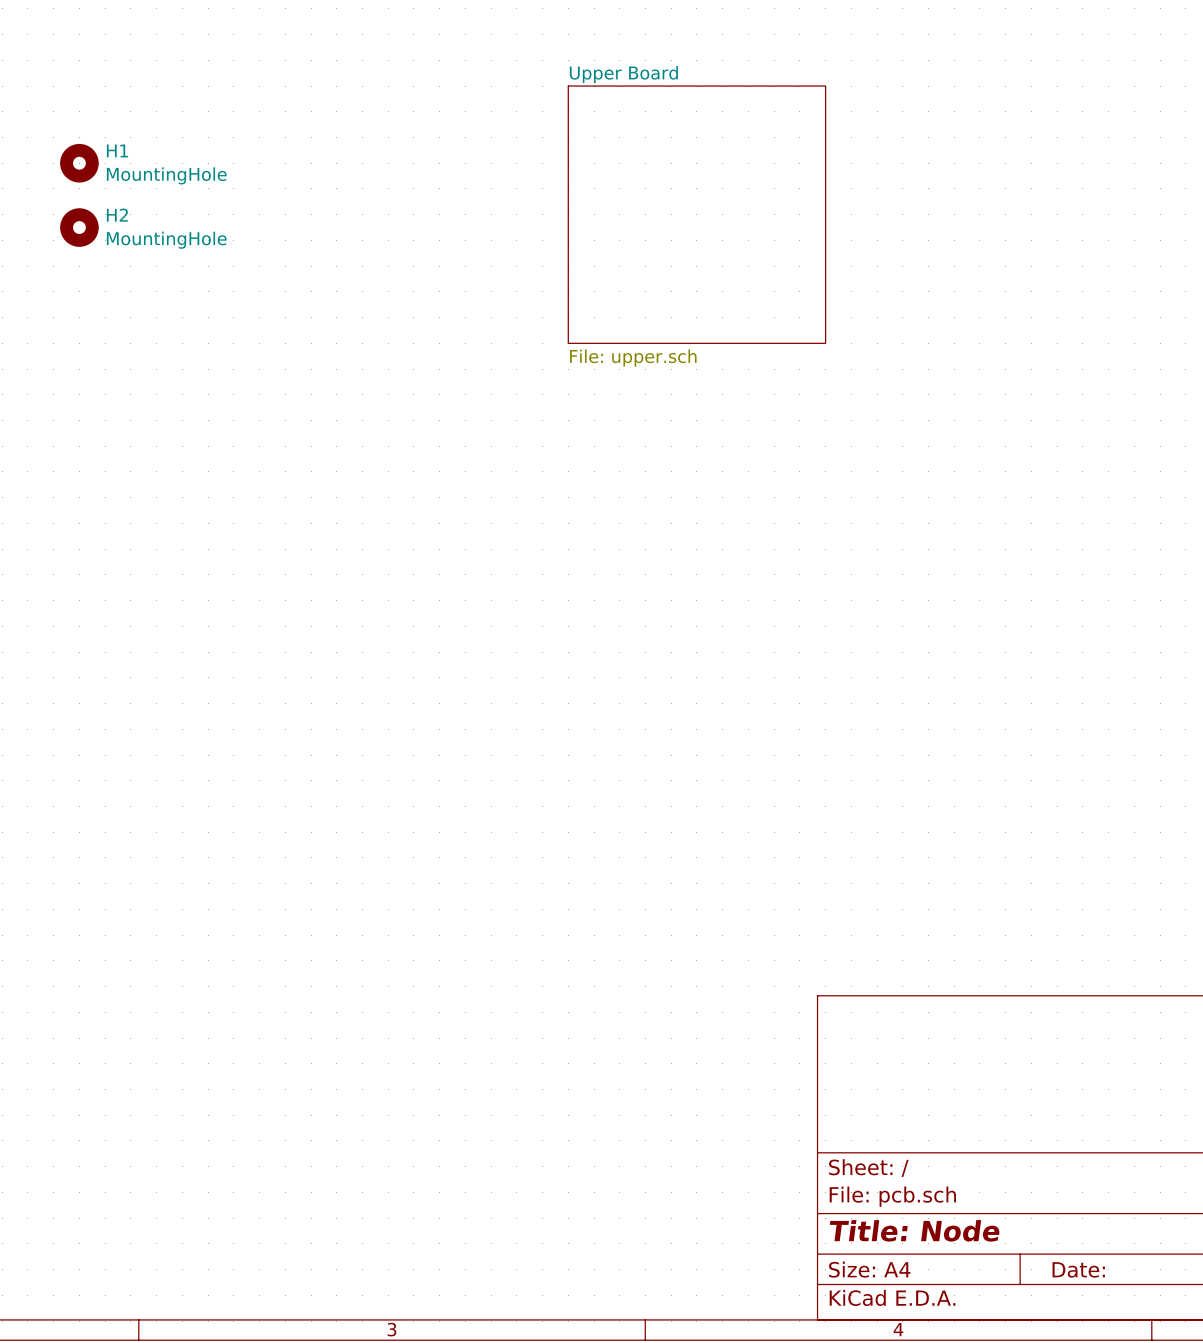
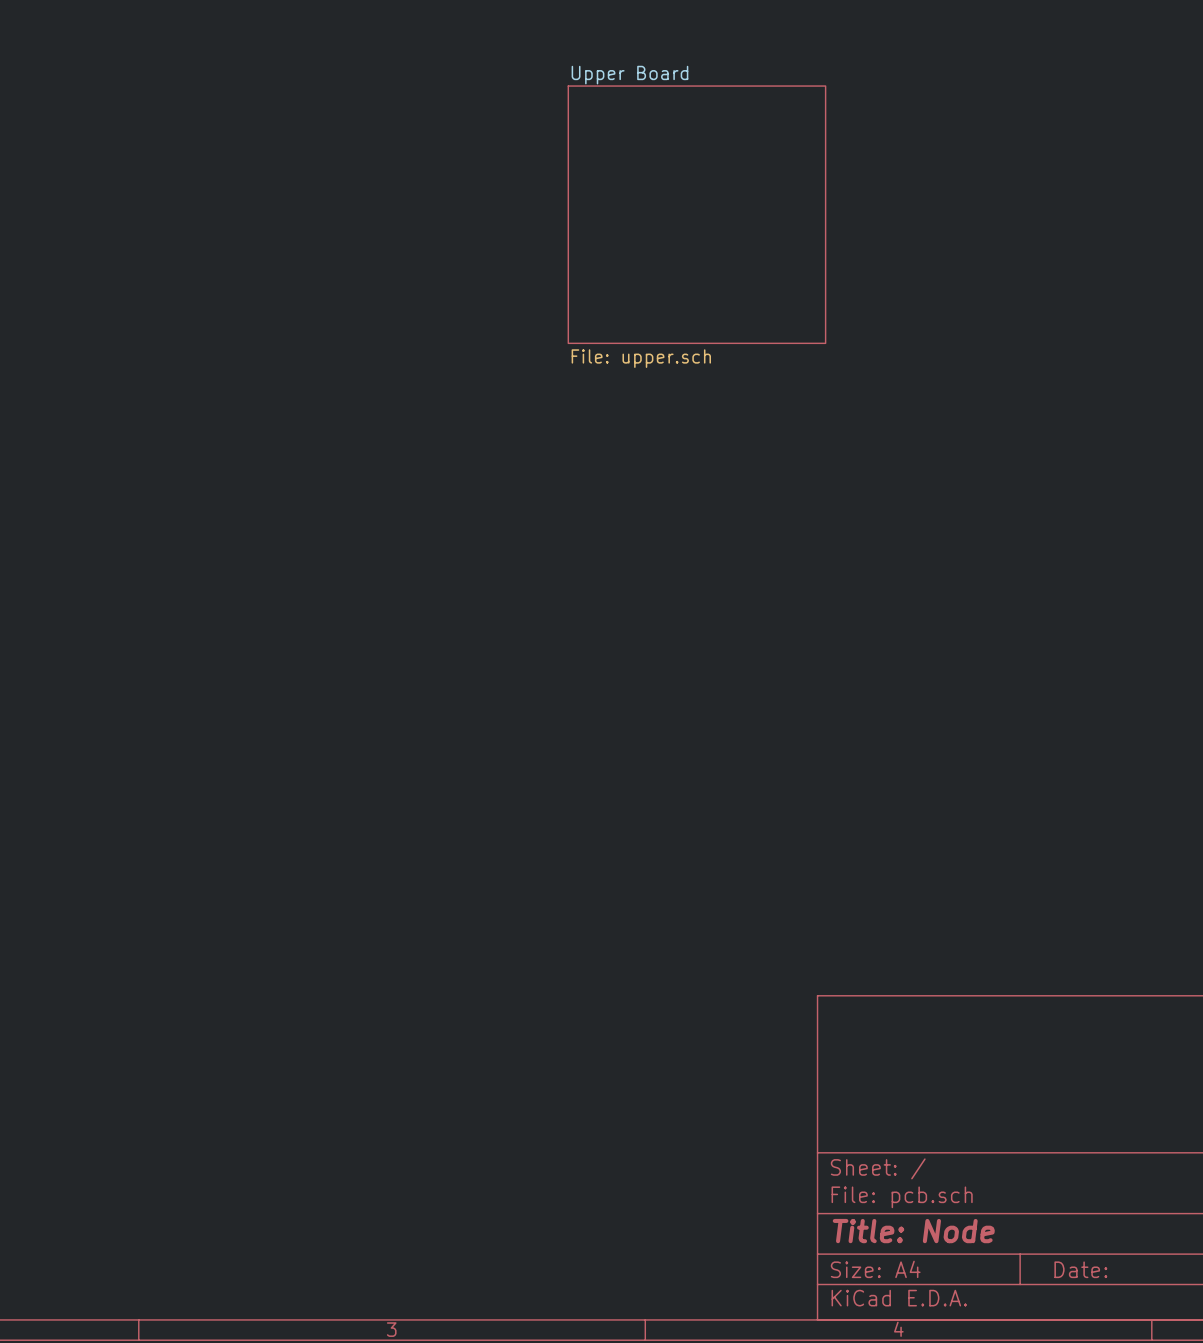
H1: MountingHole (79, 163) -> none
H2: MountingHole (79, 227) -> none

